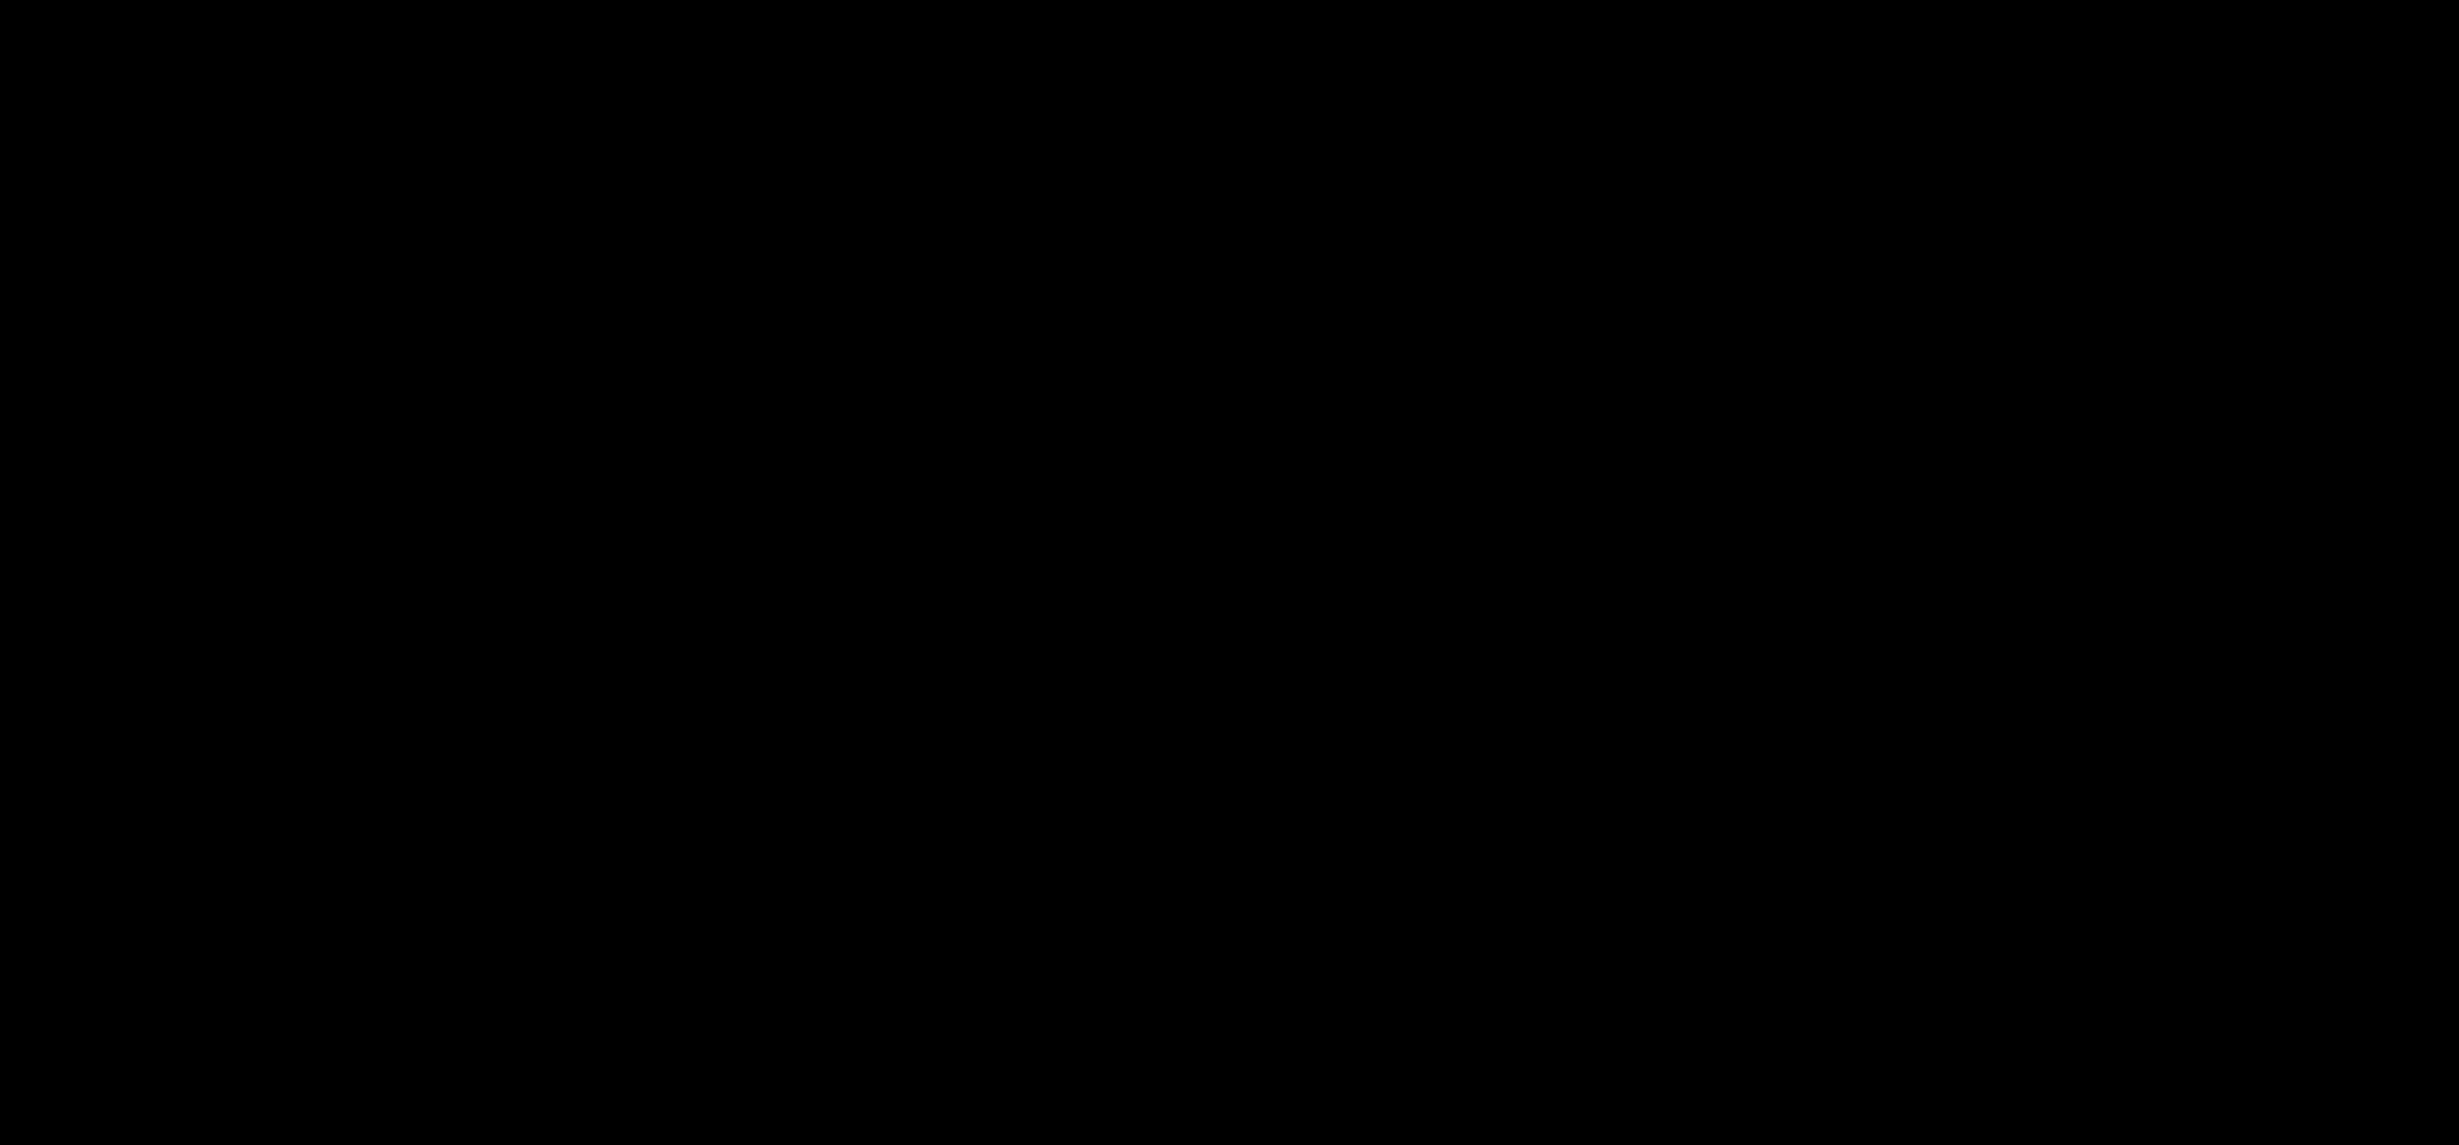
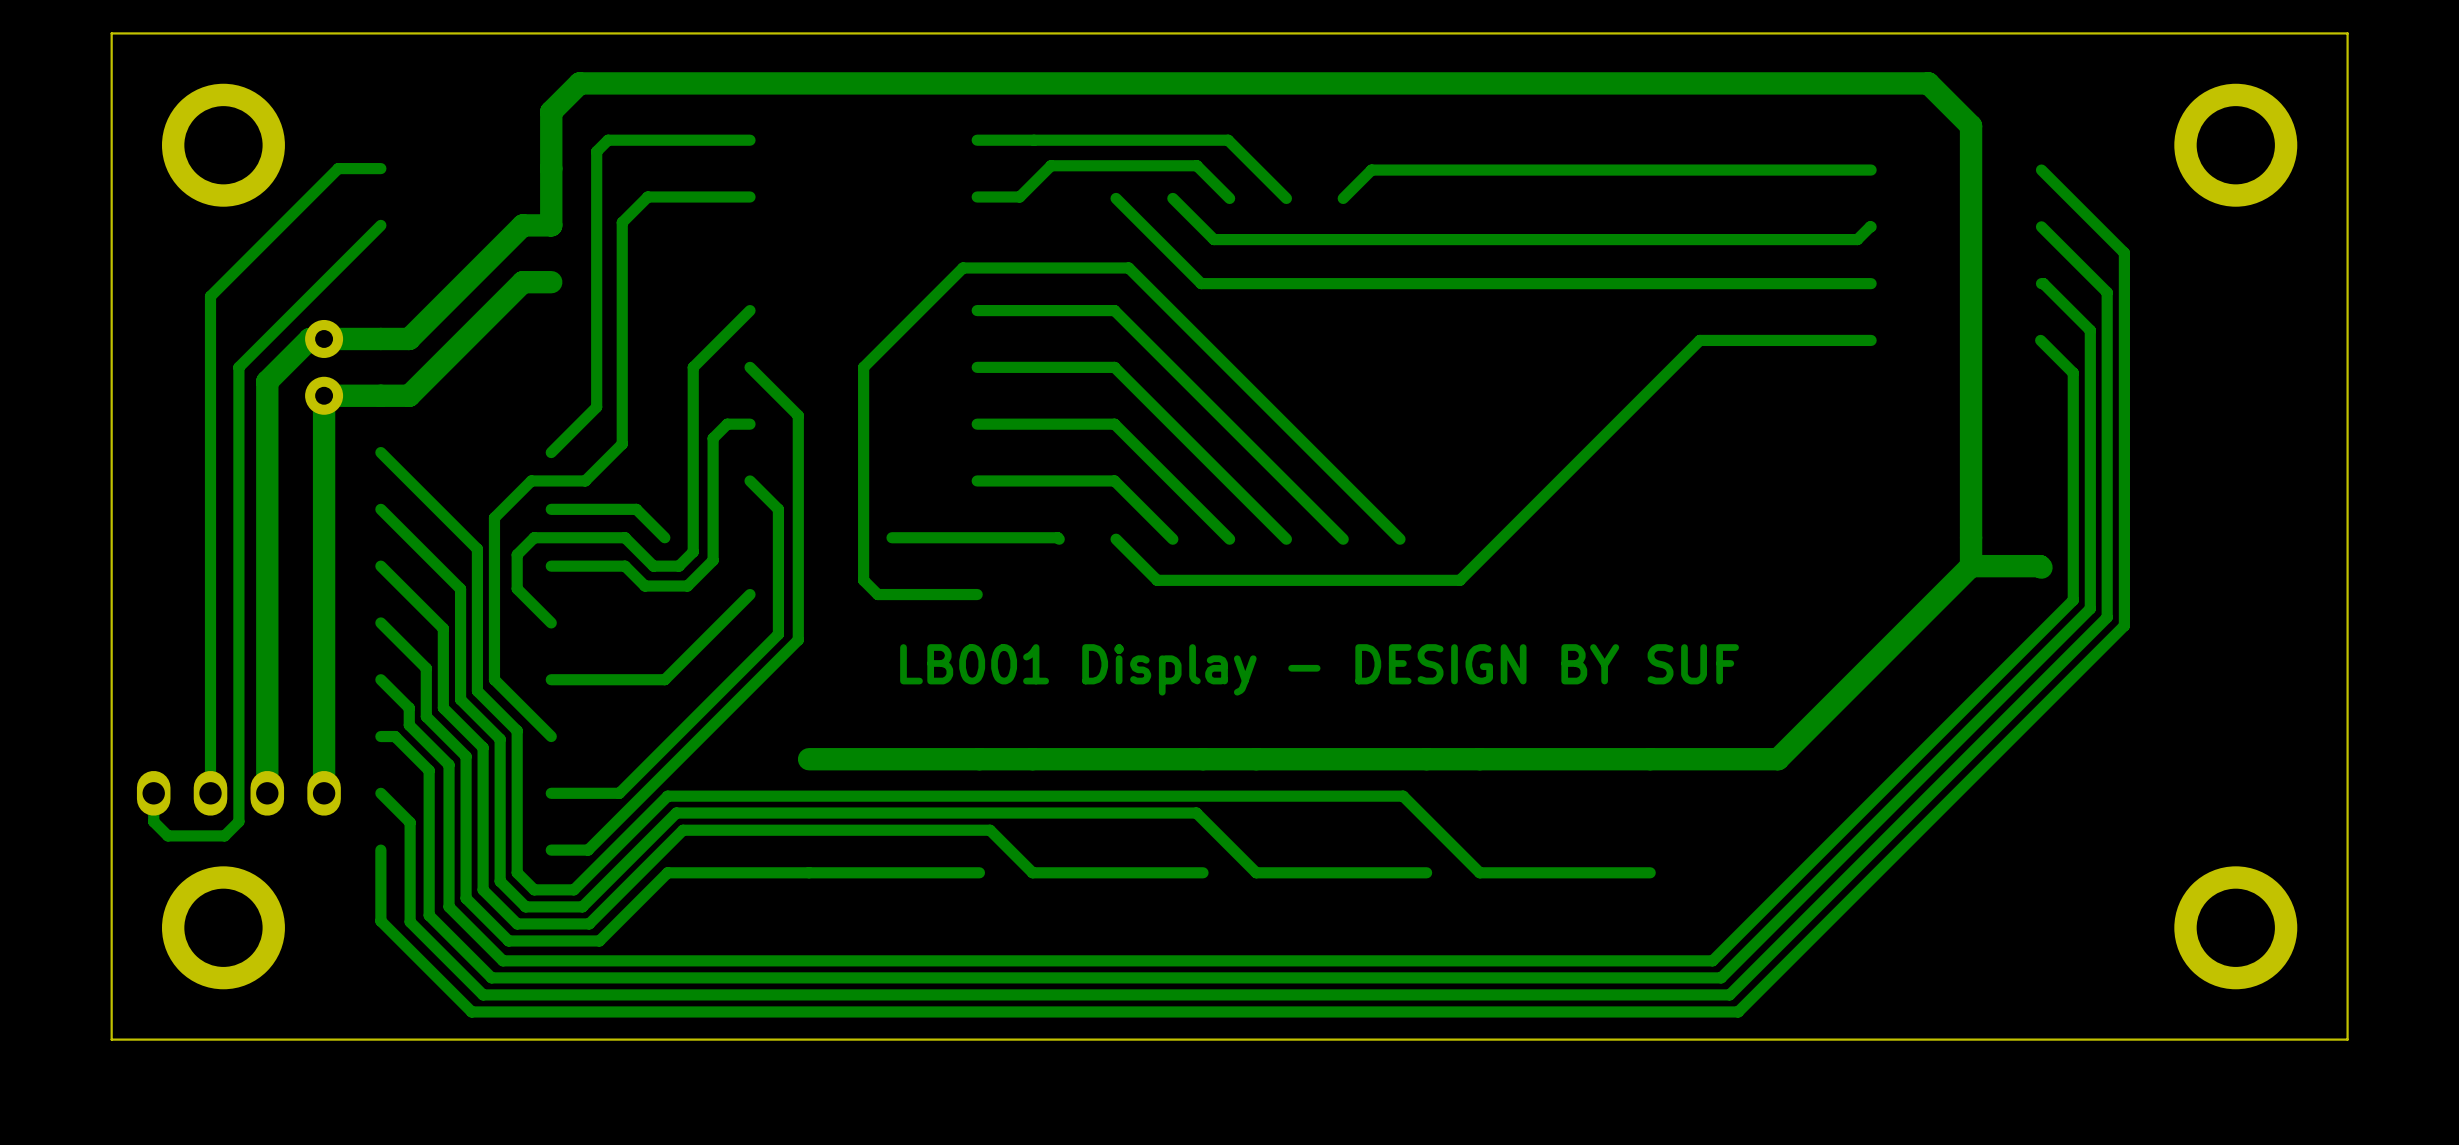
board edge: none -> (2347, 33) (2347, 1039) (111, 1039) (111, 33) (2347, 33)
track: none -> (750, 140) (608, 140) (596, 151) (596, 407) (551, 452)
track: none -> (977, 140) (1228, 140) (1286, 198)
part: none -> (223, 145)
part: none -> (2235, 145)
track: none -> (380, 168) (338, 168) (210, 296) (210, 793)
track: none -> (1871, 170) (1371, 170) (1343, 198)
track: none -> (2041, 170) (2124, 252) (2124, 625) (1738, 1011) (471, 1011) (380, 921) (380, 850)
track: none -> (750, 196) (647, 196) (622, 222) (622, 444) (585, 480) (531, 480) (494, 517) (494, 679) (551, 736)
track: none -> (977, 196) (1019, 196) (1051, 165) (1196, 165) (1229, 198)
track: none -> (1116, 198) (1201, 283) (1871, 283)
track: none -> (1172, 198) (1213, 239) (1857, 239) (1871, 226)
track: none -> (380, 225) (238, 367) (238, 821) (224, 835) (167, 835) (153, 821) (153, 793)
track: none -> (2041, 226) (2107, 292) (2107, 617) (1729, 994) (483, 994) (410, 921) (410, 822) (380, 793)
track: none -> (551, 282) (522, 282) (409, 395) (324, 395) (324, 793)
track: none -> (2041, 283) (2090, 330) (2090, 608) (1721, 977) (491, 977) (429, 915) (429, 770) (395, 736) (380, 736)
track: none -> (750, 310) (693, 367) (693, 551) (679, 566) (653, 566) (625, 537) (534, 537) (517, 554) (517, 588) (551, 622)
track: none -> (977, 310) (1114, 310) (1343, 539)
track: none -> (1871, 340) (1699, 340) (1459, 580) (1157, 580) (1116, 539)
track: none -> (2040, 340) (2073, 373) (2073, 600) (1712, 960) (502, 960) (449, 906) (449, 764) (409, 725) (409, 708) (380, 679)
part: none -> (324, 367)
track: none -> (750, 367) (798, 415) (798, 639) (588, 850) (551, 850)
track: none -> (977, 367) (1114, 367) (1286, 539)
track: none -> (750, 424) (727, 424) (713, 438) (713, 560) (687, 586) (644, 586) (625, 566) (551, 566)
track: none -> (977, 424) (1114, 424) (1229, 539)
track: none -> (380, 452) (477, 549) (477, 691) (517, 730) (517, 872) (534, 889) (573, 889) (667, 796) (1403, 796) (1479, 872) (1650, 872)
track: none -> (750, 480) (778, 509) (778, 634) (619, 793) (551, 793)
track: none -> (977, 480) (1114, 480) (1172, 539)
track: none -> (380, 509) (460, 589) (460, 699) (500, 739) (500, 881) (525, 906) (582, 906) (676, 813) (1196, 813) (1256, 872) (1426, 872)
track: none -> (551, 509) (636, 509) (664, 537)
track: none -> (892, 537) (1059, 539)
track: none -> (1400, 539) (1128, 267) (963, 267) (863, 367) (863, 580) (877, 594) (977, 594)
track: none -> (380, 566) (443, 628) (443, 707) (483, 747) (483, 889) (517, 923) (589, 923) (683, 830) (990, 830) (1032, 872) (1203, 872)
track: none -> (1971, 566) (1971, 126) (1928, 83) (579, 83) (551, 111) (551, 225) (522, 225) (409, 338) (309, 338) (267, 381) (267, 793)
track: none -> (1971, 566) (2041, 567)
track: none -> (1971, 566) (1777, 759) (809, 759)
track: none -> (750, 594) (664, 679) (551, 679)
track: none -> (380, 622) (426, 668) (426, 716) (466, 756) (466, 898) (508, 940) (599, 940) (667, 872) (979, 872)
text: none -> LB001 Display - DESIGN BY SUF (1319, 669)
part: none -> (238, 793)
part: none -> (223, 927)
part: none -> (2235, 927)

